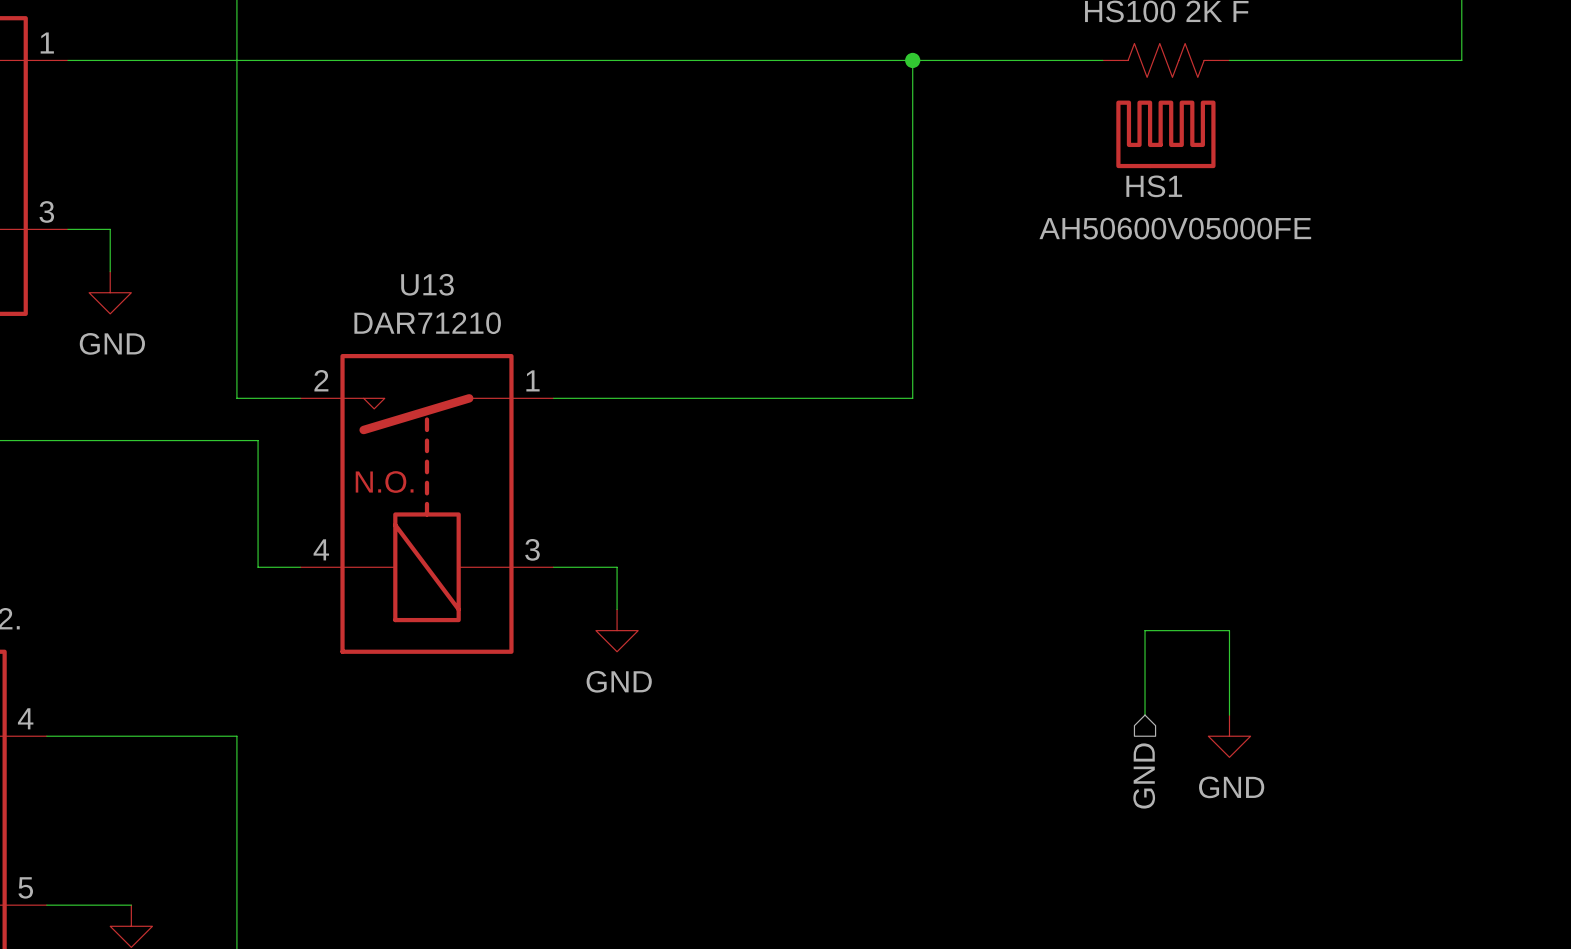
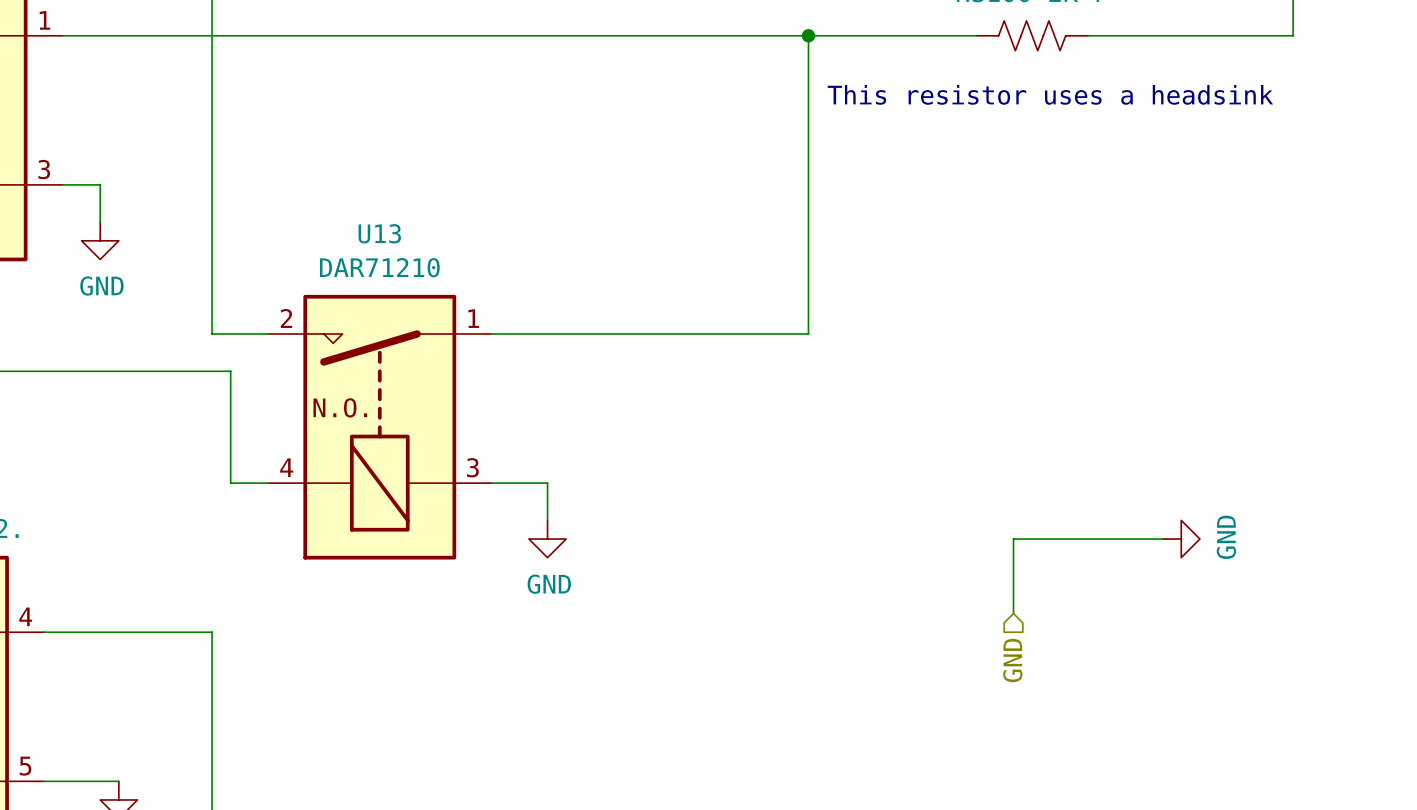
text: none -> This resistor uses a headsink (1050, 94)
HS1: AH50600V05000FE (1165, 134) -> none
wire: (1229, 630) (1229, 715) -> (1088, 539) (1162, 539)
power symbol rotation: 0° (1229, 736) -> 90° counterclockwise (1181, 539)
power symbol position: GND (1229, 736) -> GND (1181, 539)

